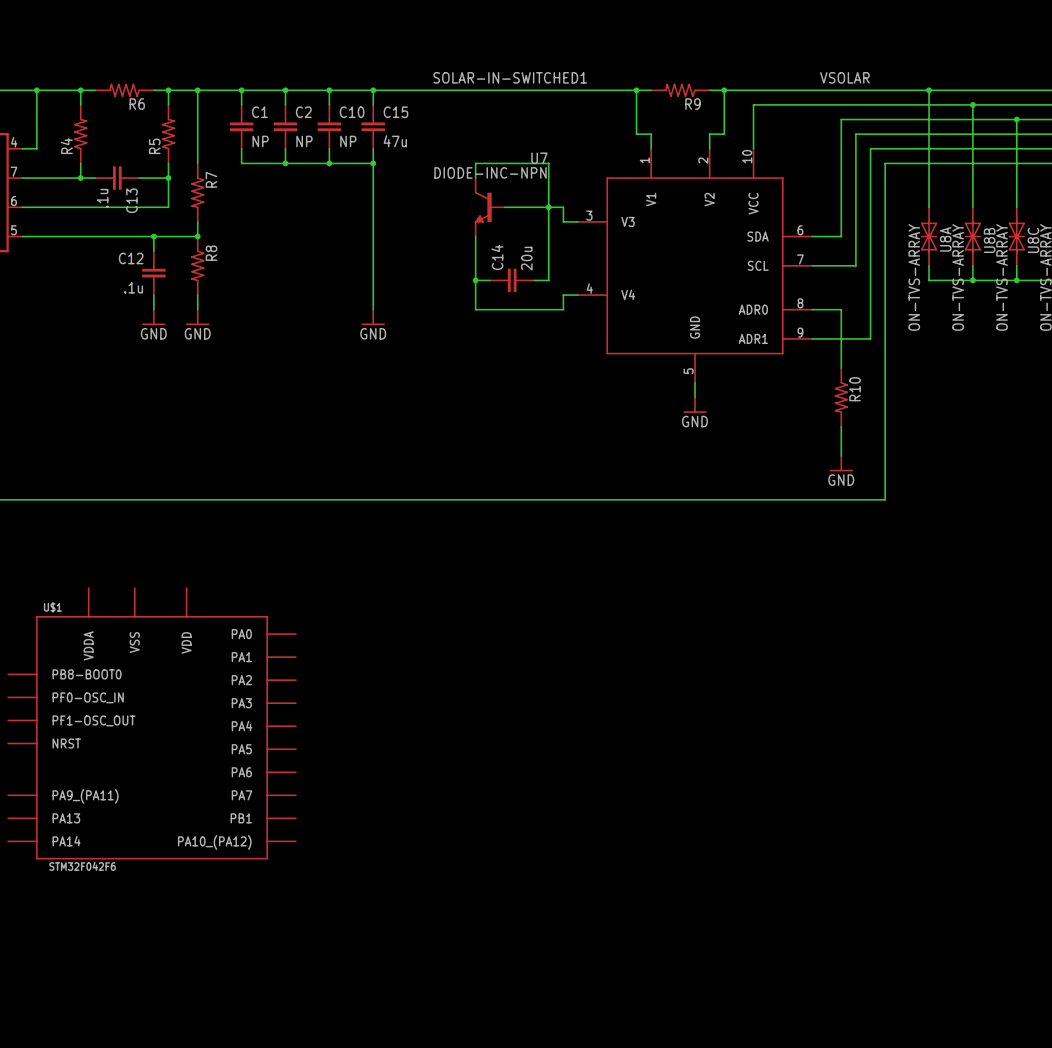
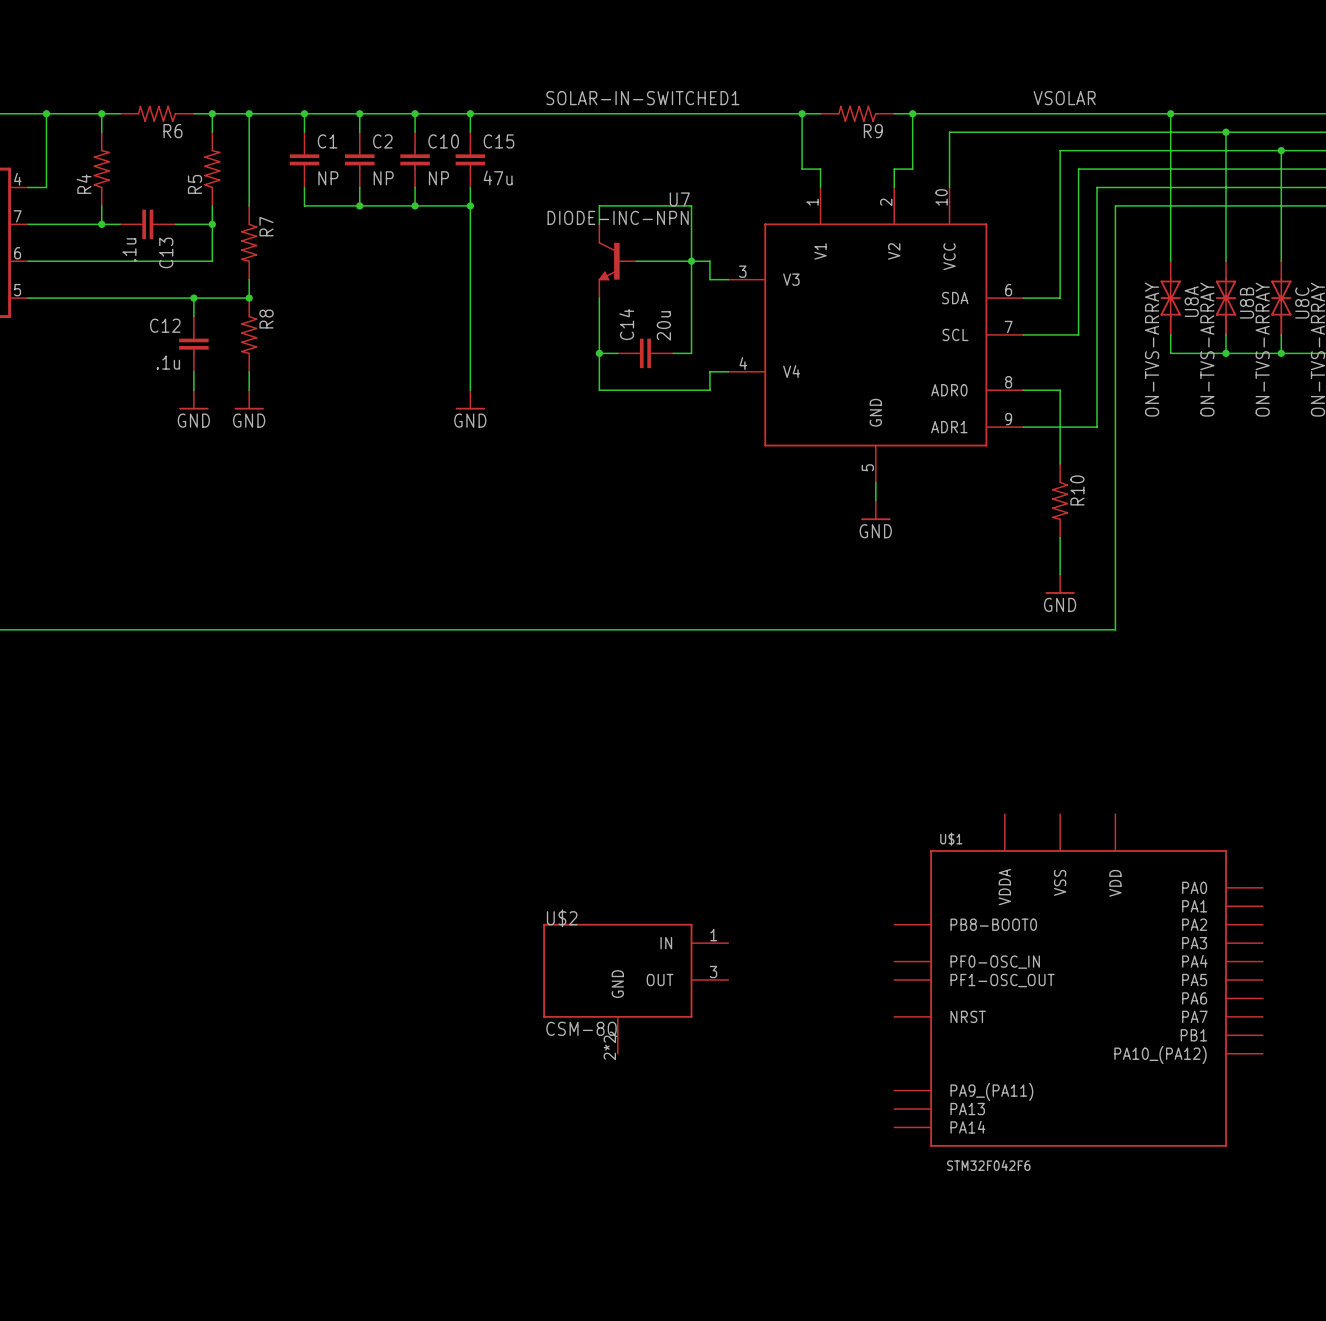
U$1 symbol: [8, 588, 296, 860] -> [894, 814, 1263, 1147]
U$2: none -> CSM-8Q (635, 988)

